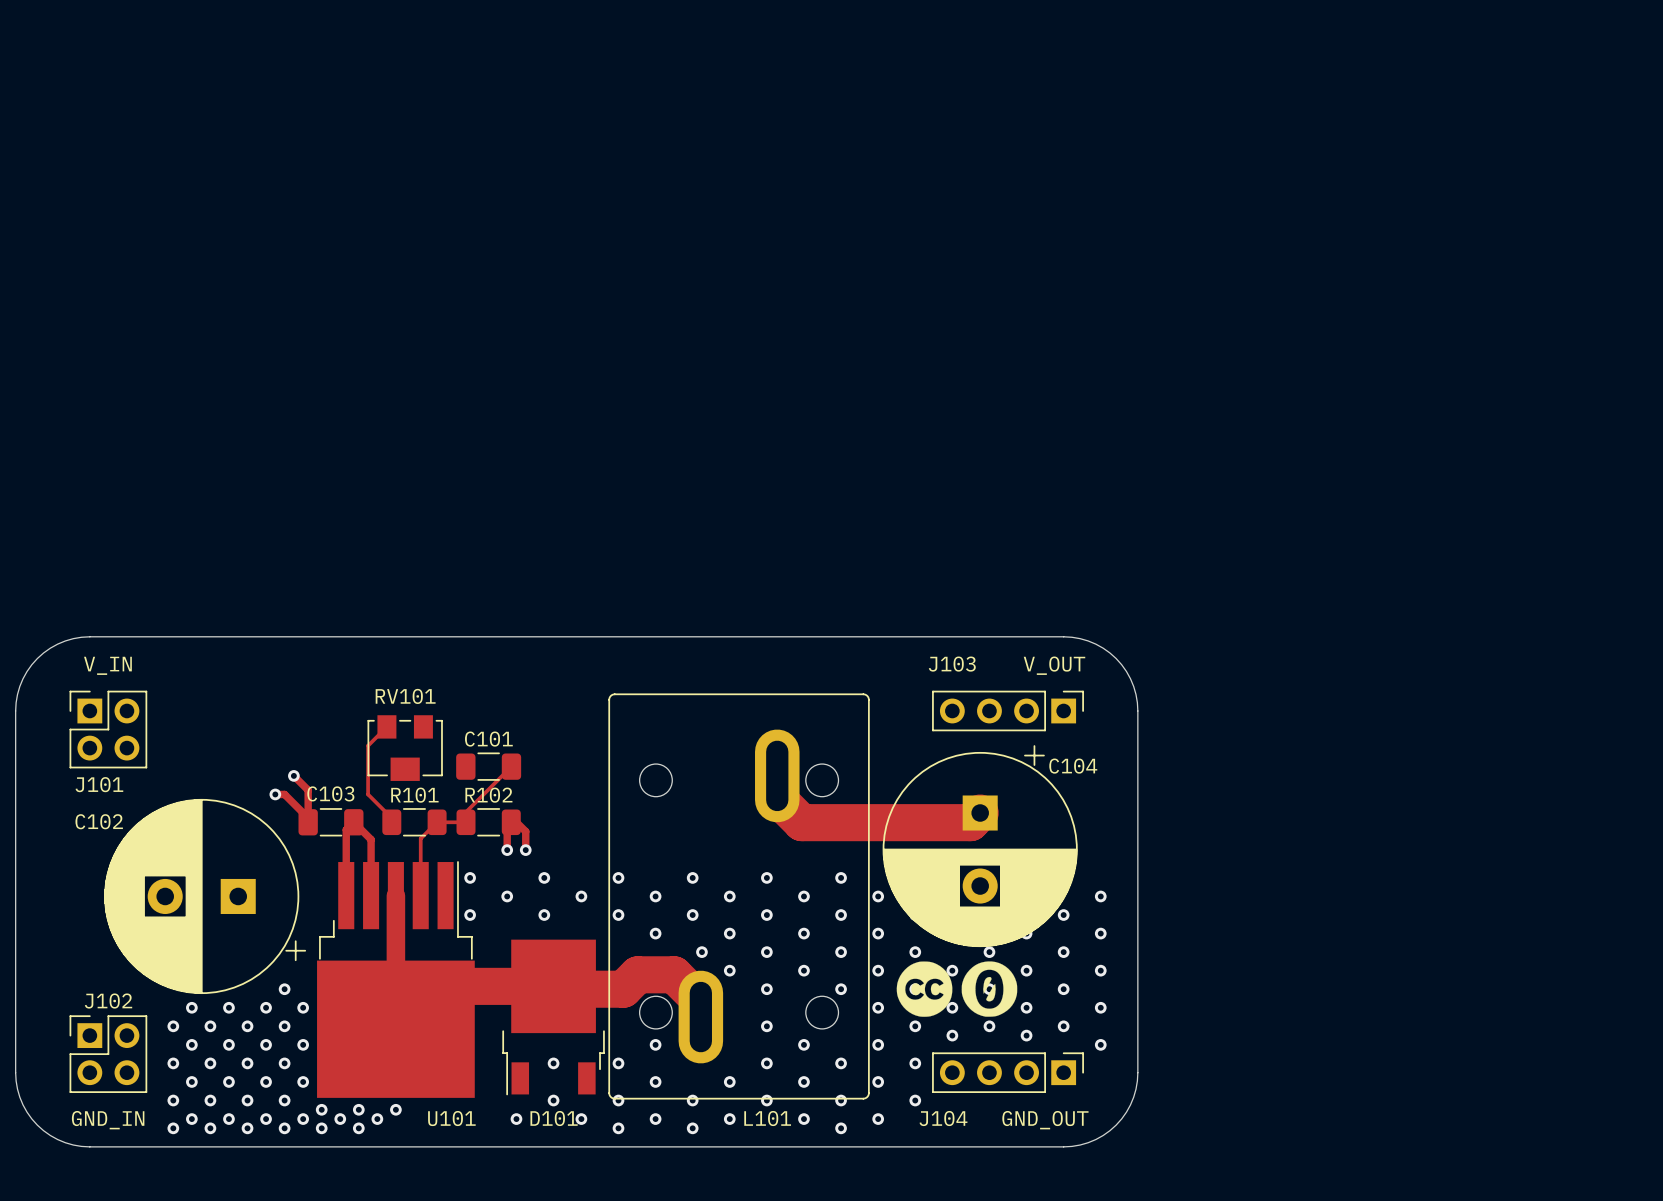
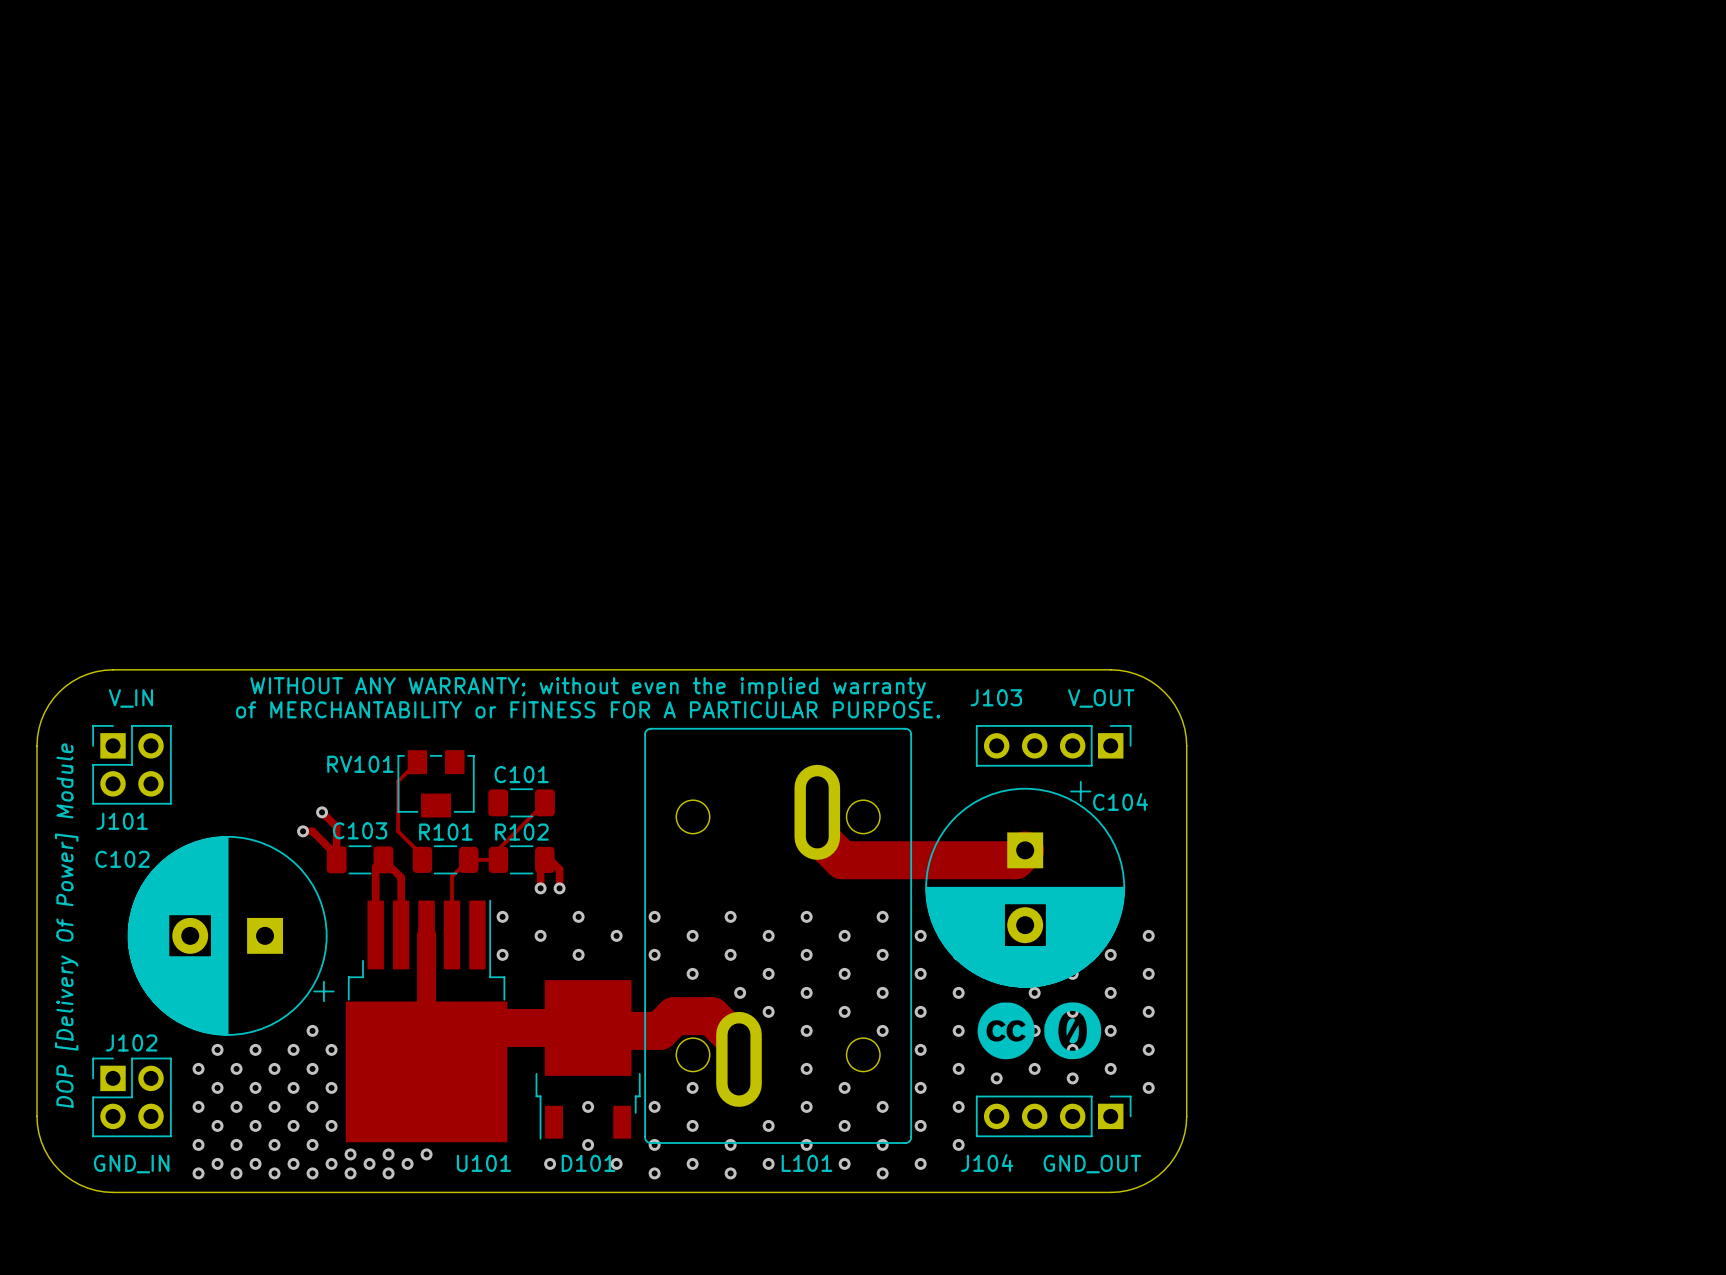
text: none -> WITHOUT ANY WARRANTY; without even the implied warranty (588, 688)
text: none -> of MERCHANTABILITY or FITNESS FOR A PARTICULAR PURPOSE. (588, 709)
RV101 name position: RV101 (405, 696) -> RV101 (360, 764)
text: none -> DOP [Delivery Of Power] Module (66, 925)
drawing position: (924, 989) -> (1006, 1030)
drawing position: (989, 989) -> (1072, 1030)

